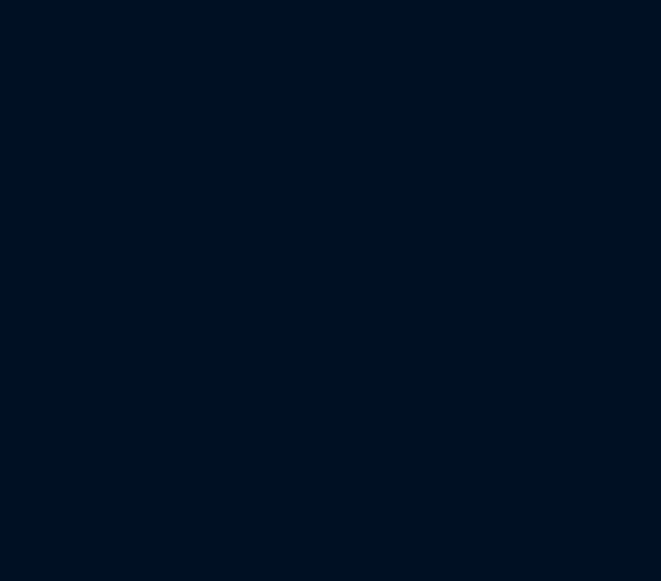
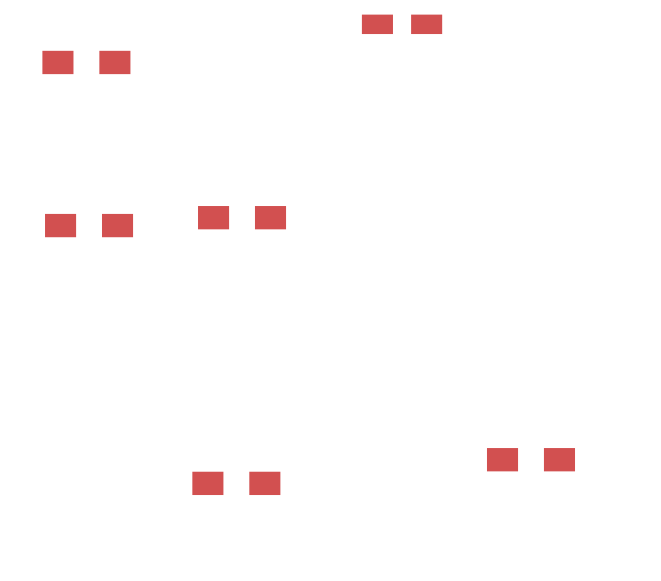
part: none -> (402, 24)
part: none -> (86, 62)
part: none -> (242, 217)
part: none -> (89, 225)
part: none -> (530, 459)
part: none -> (236, 483)

